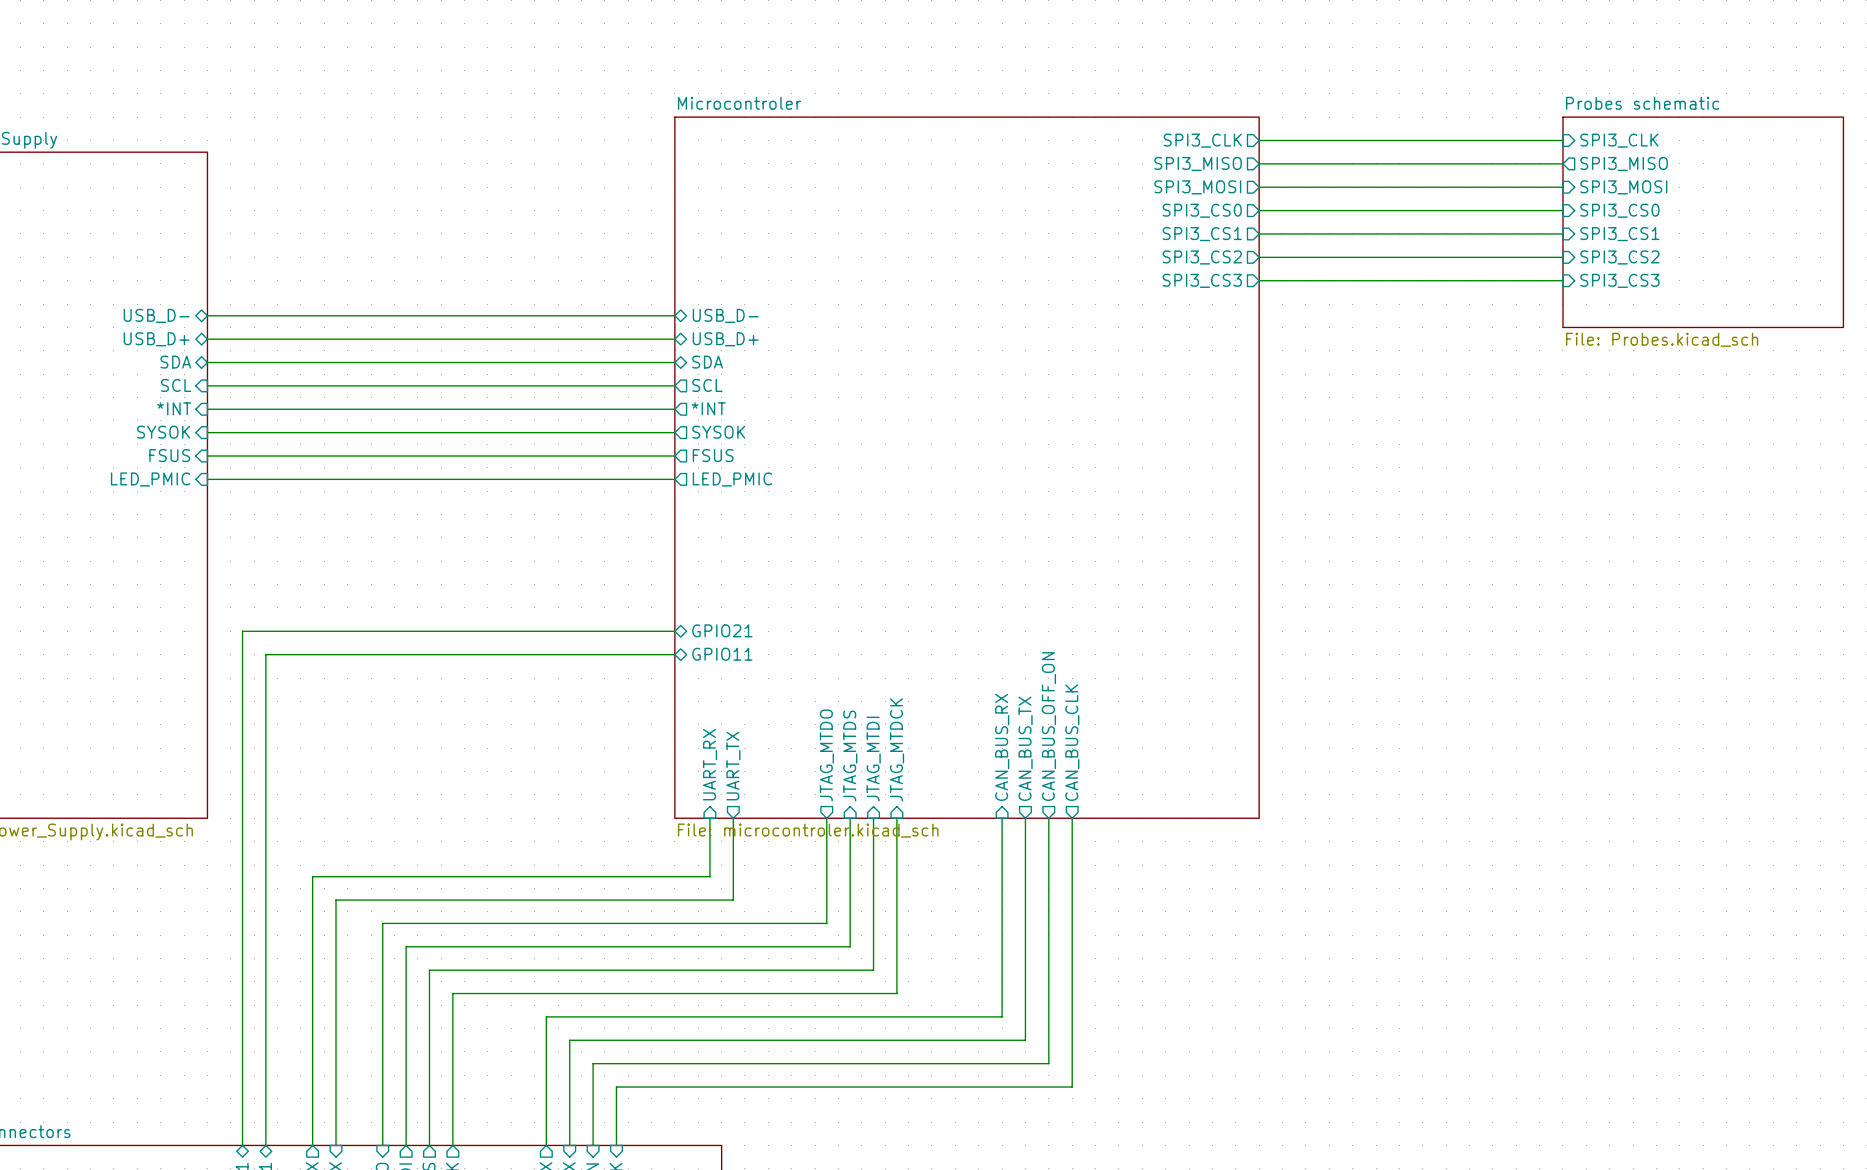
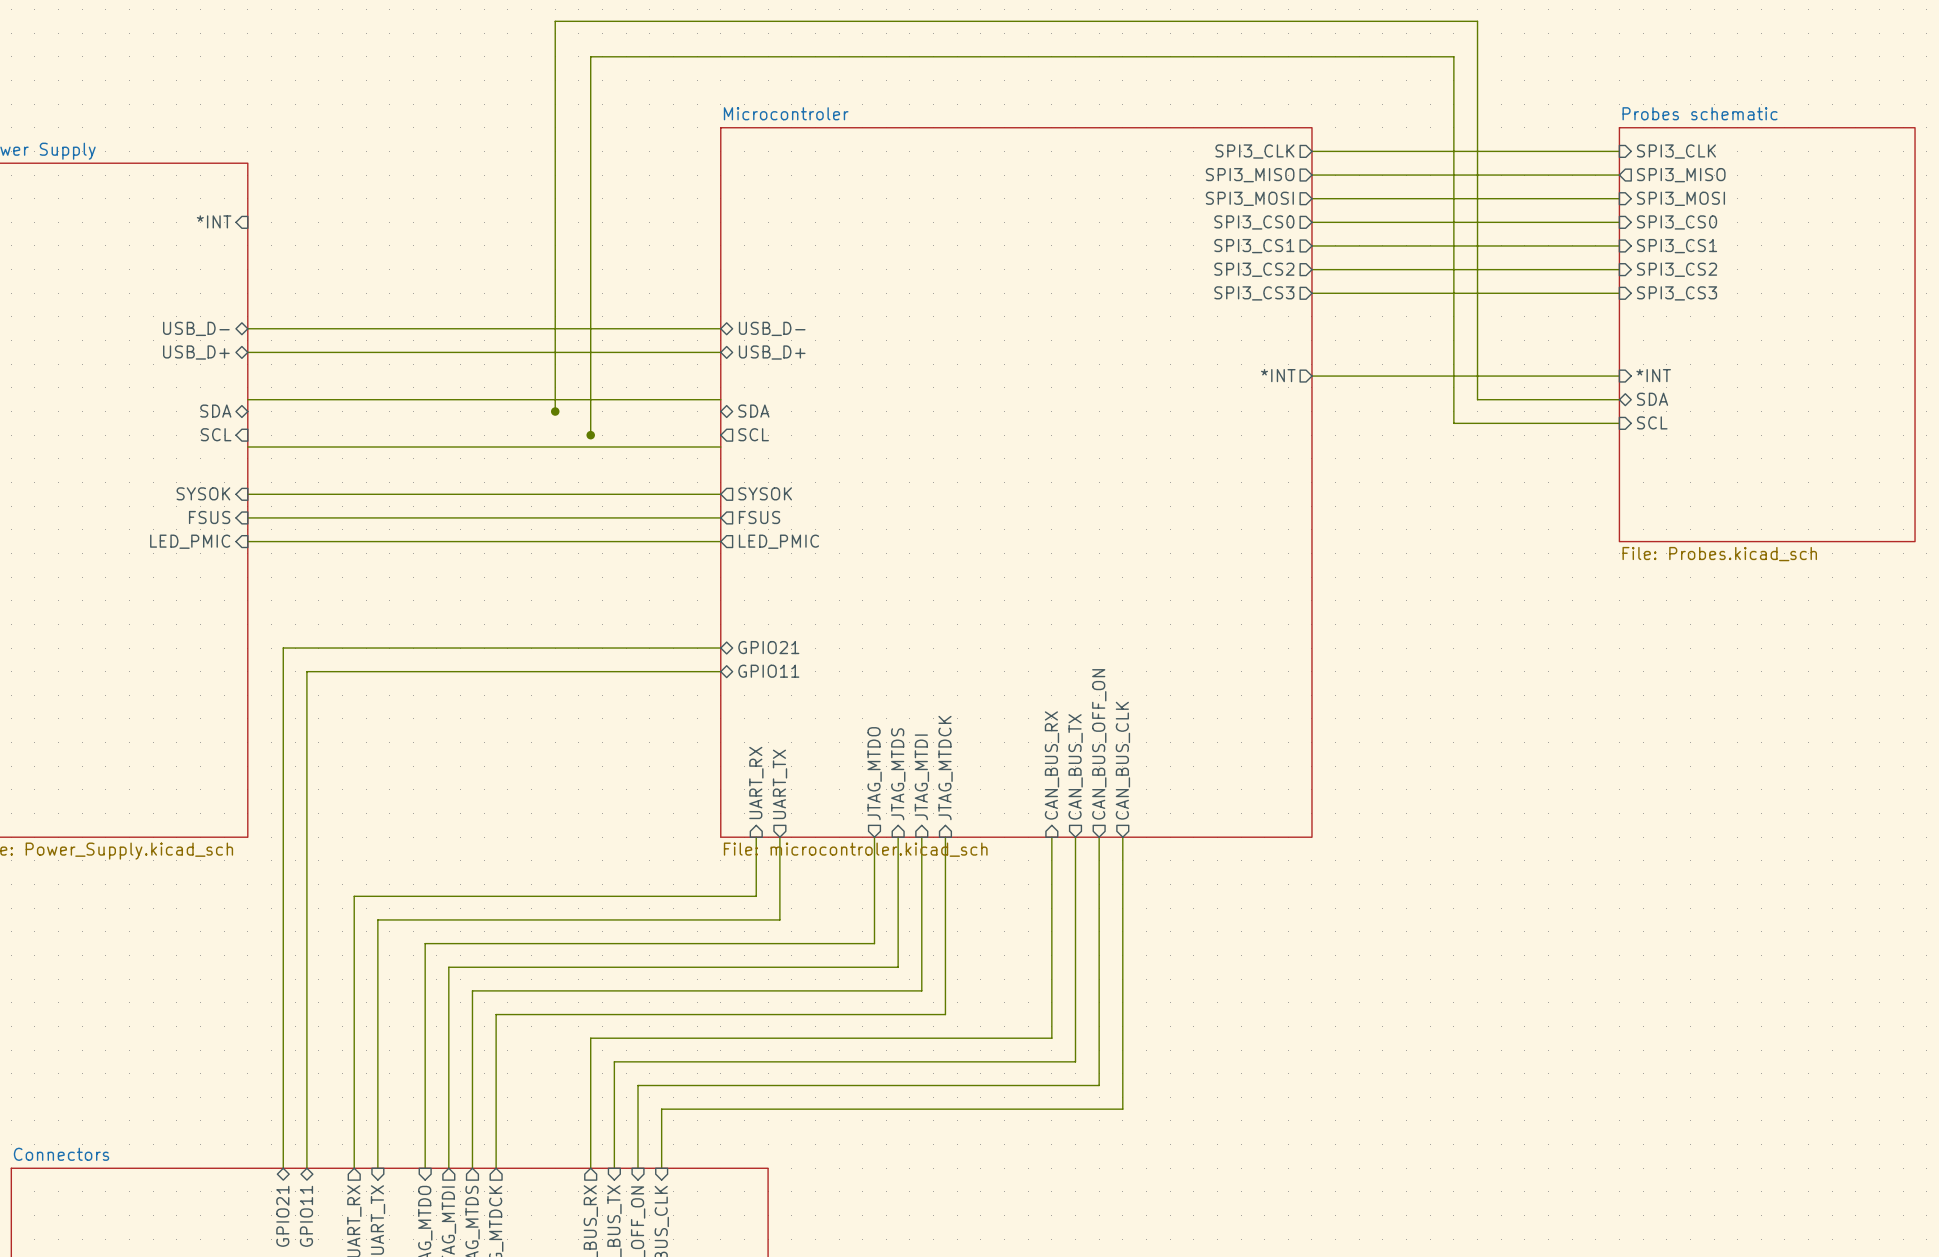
sheet Probes schematic: File: Probes.kicad_sch (1703, 222) -> none
sheet Probes schematic: none -> File: Probes.kicad_sch (1767, 334)
sheet pin position: SDA (175, 362) -> SDA (215, 411)
wire: (207, 362) (674, 362) -> none
sheet pin position: SDA (707, 362) -> SDA (753, 411)
sheet pin: none -> *INT (1278, 375)
wire: none -> (1311, 376) (1619, 376)
sheet pin: none -> *INT (1653, 375)
sheet pin position: SCL (176, 385) -> SCL (216, 434)
sheet pin position: SCL (707, 385) -> SCL (753, 434)
wire: none -> (1619, 399) (1477, 399) (1477, 21) (555, 21) (555, 411)
sheet pin: none -> SDA (1652, 399)
junction: none -> (555, 411)
sheet pin position: *INT (174, 408) -> *INT (214, 221)
sheet pin: *INT (708, 408) -> none
sheet pin: none -> SCL (1652, 422)
wire: (207, 409) (674, 409) -> (247, 541) (720, 541)
wire: none -> (1619, 423) (1453, 423) (1453, 56) (590, 56) (590, 435)
junction: none -> (590, 435)
sheet pin: SYSOK (163, 432) -> none
sheet pin: SYSOK (718, 432) -> none
sheet pin position: FSUS (169, 455) -> FSUS (209, 517)
sheet pin position: FSUS (713, 455) -> FSUS (759, 517)
wire: (207, 456) (674, 456) -> (247, 517) (720, 517)
sheet pin: LED_PMIC (150, 479) -> SYSOK (203, 493)
sheet pin: LED_PMIC (732, 479) -> SYSOK (765, 493)
sheet pin: none -> LED_PMIC (190, 541)
sheet pin: none -> LED_PMIC (778, 541)

